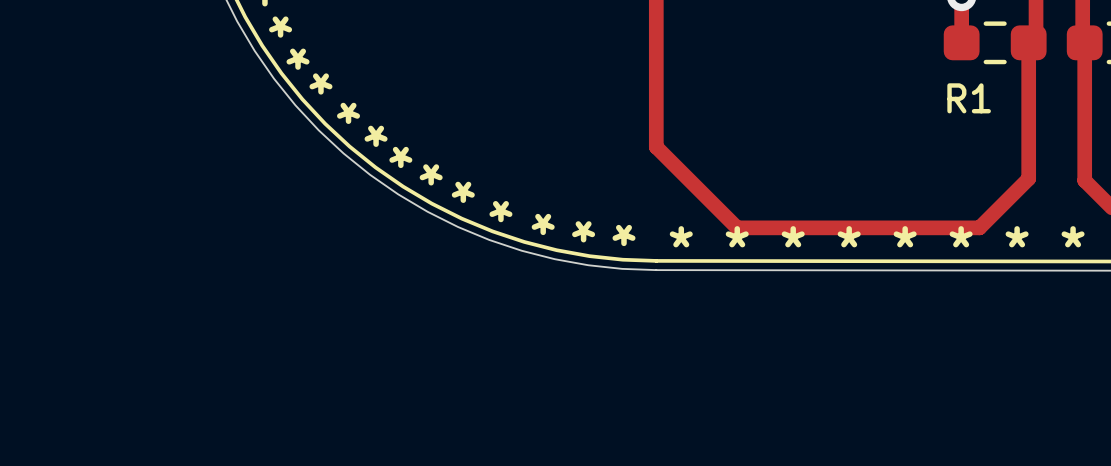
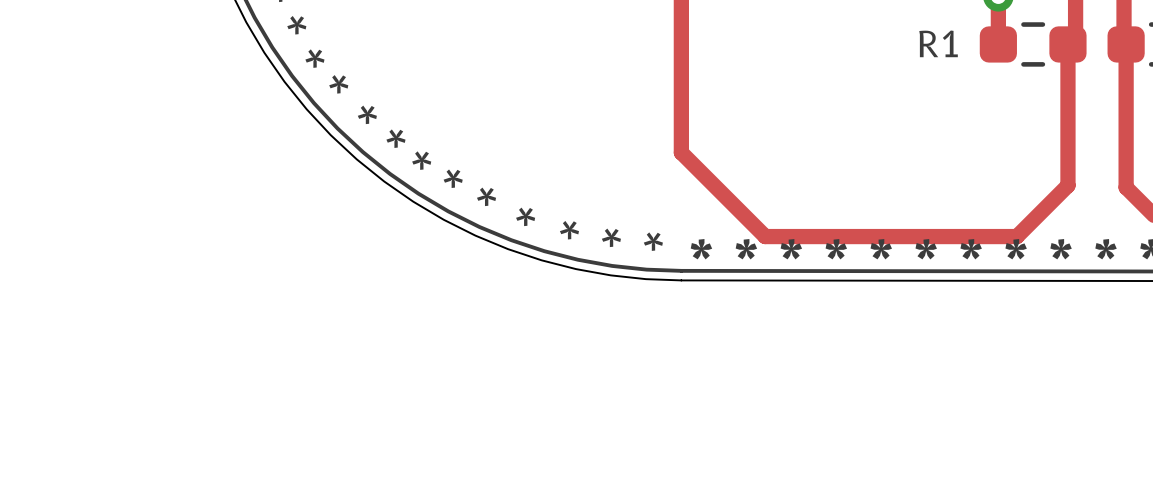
R1 name position: R1 (969, 98) -> R1 (938, 43)

